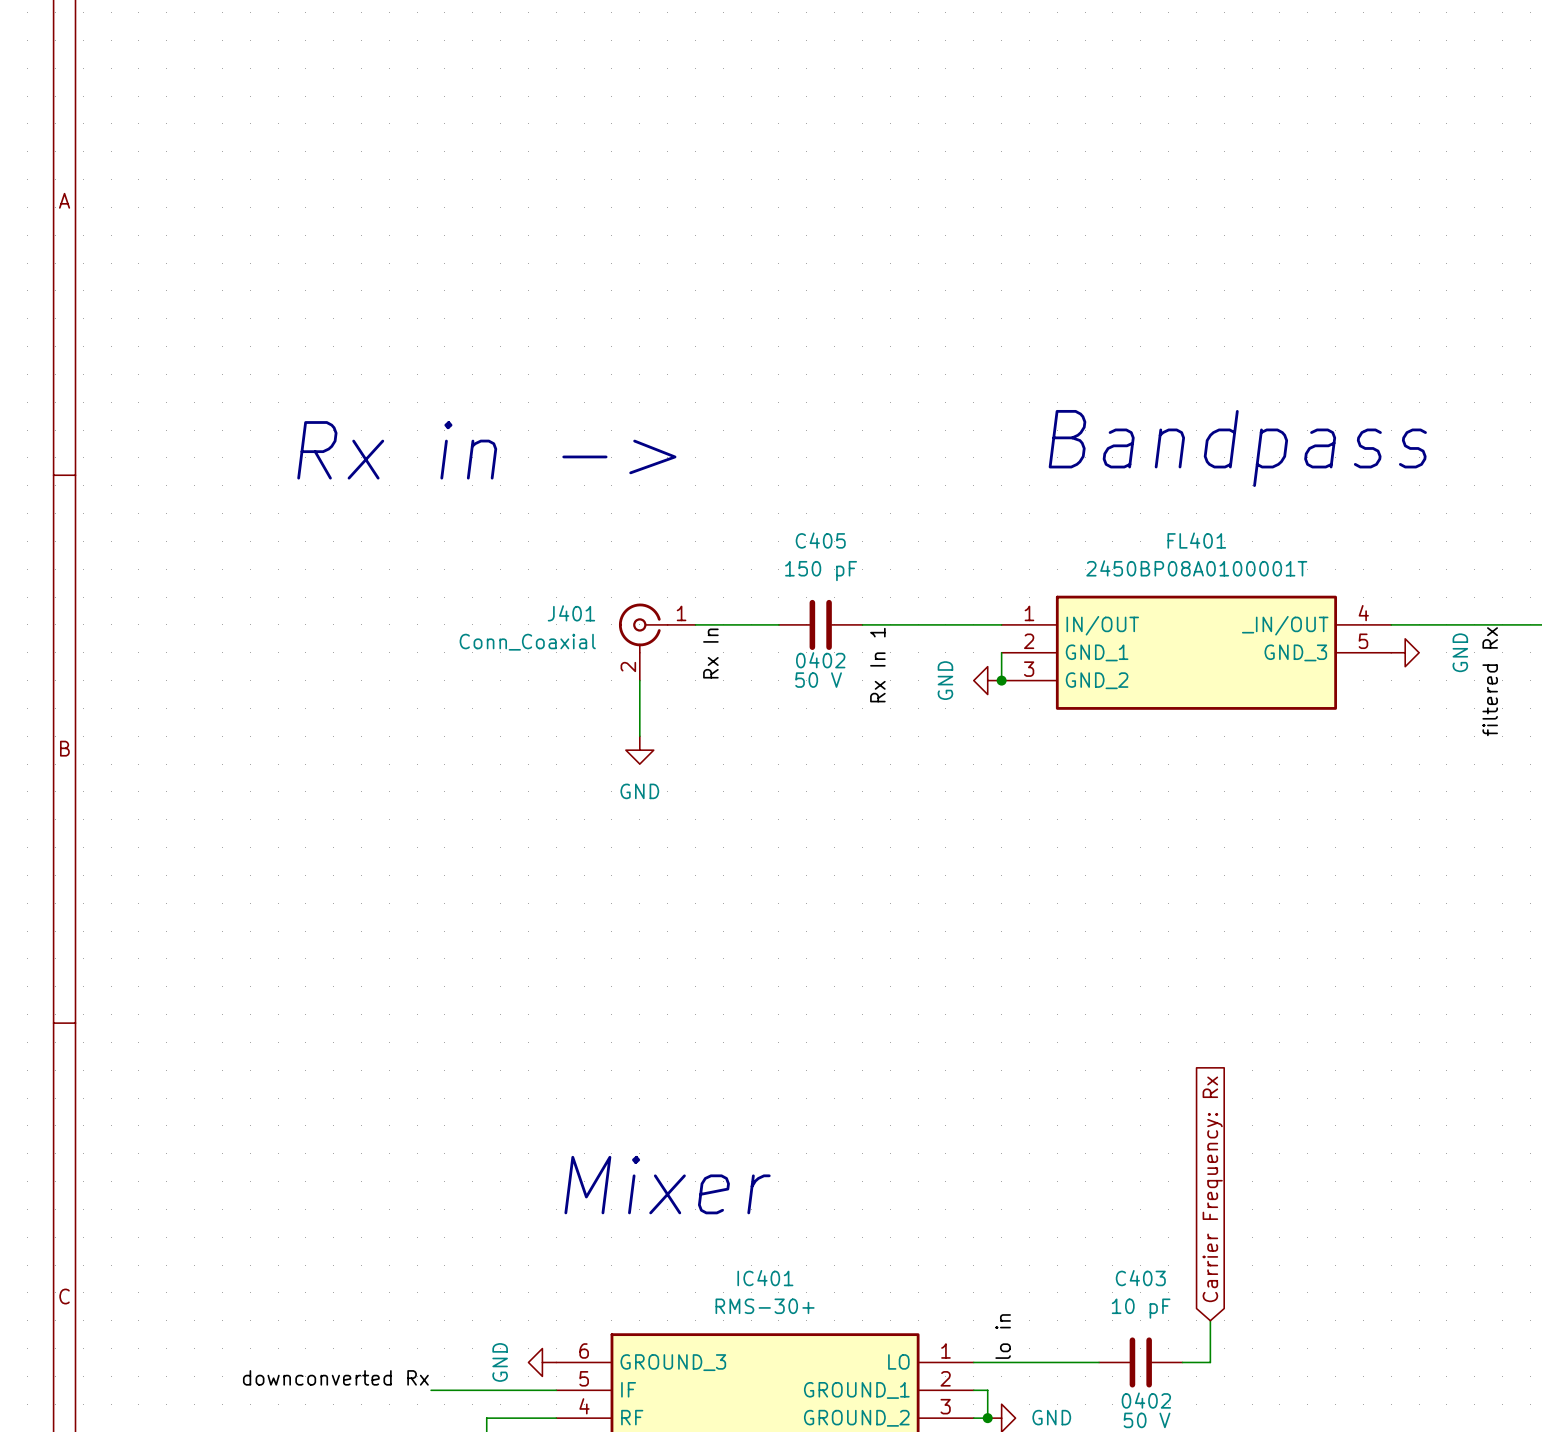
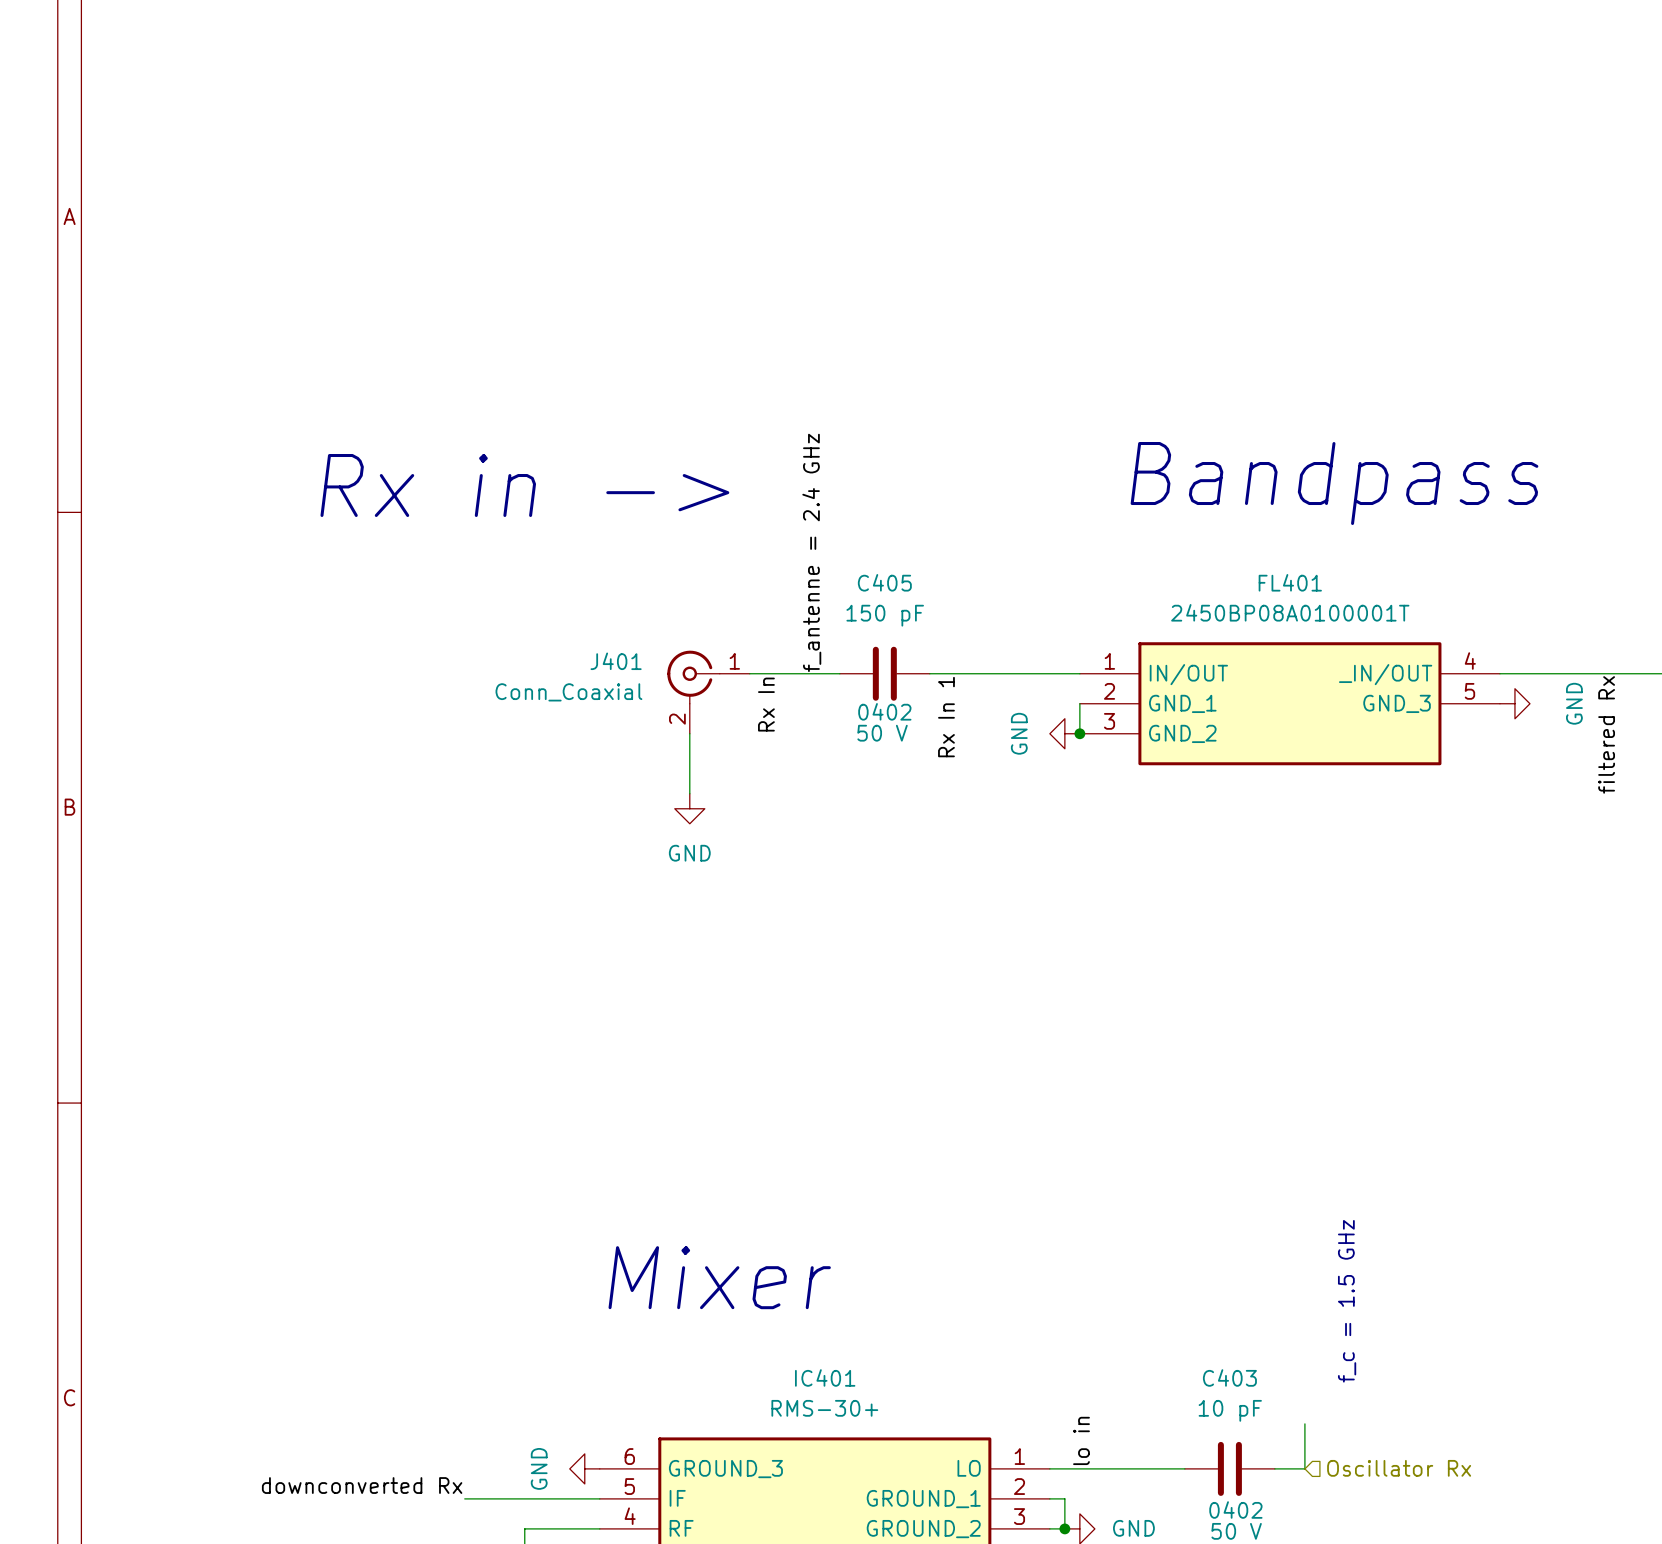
label: none -> f_antenne = 2.4 GHz (811, 552)
global label: Carrier Frequency: Rx (1212, 1189) -> none
text: none -> f_c = 1.5 GHz (1347, 1301)
hierarchical label: none -> Oscillator Rx (1399, 1468)

